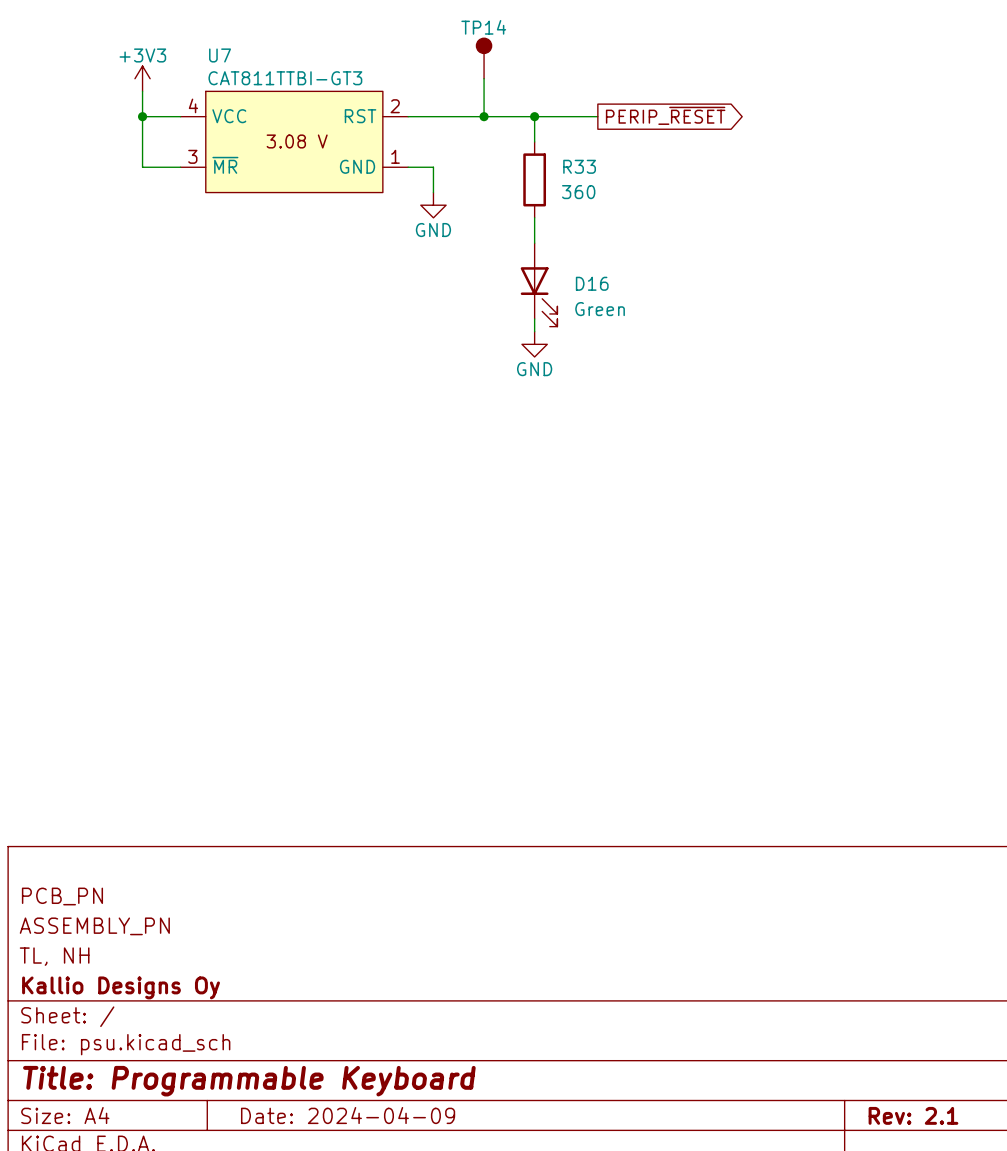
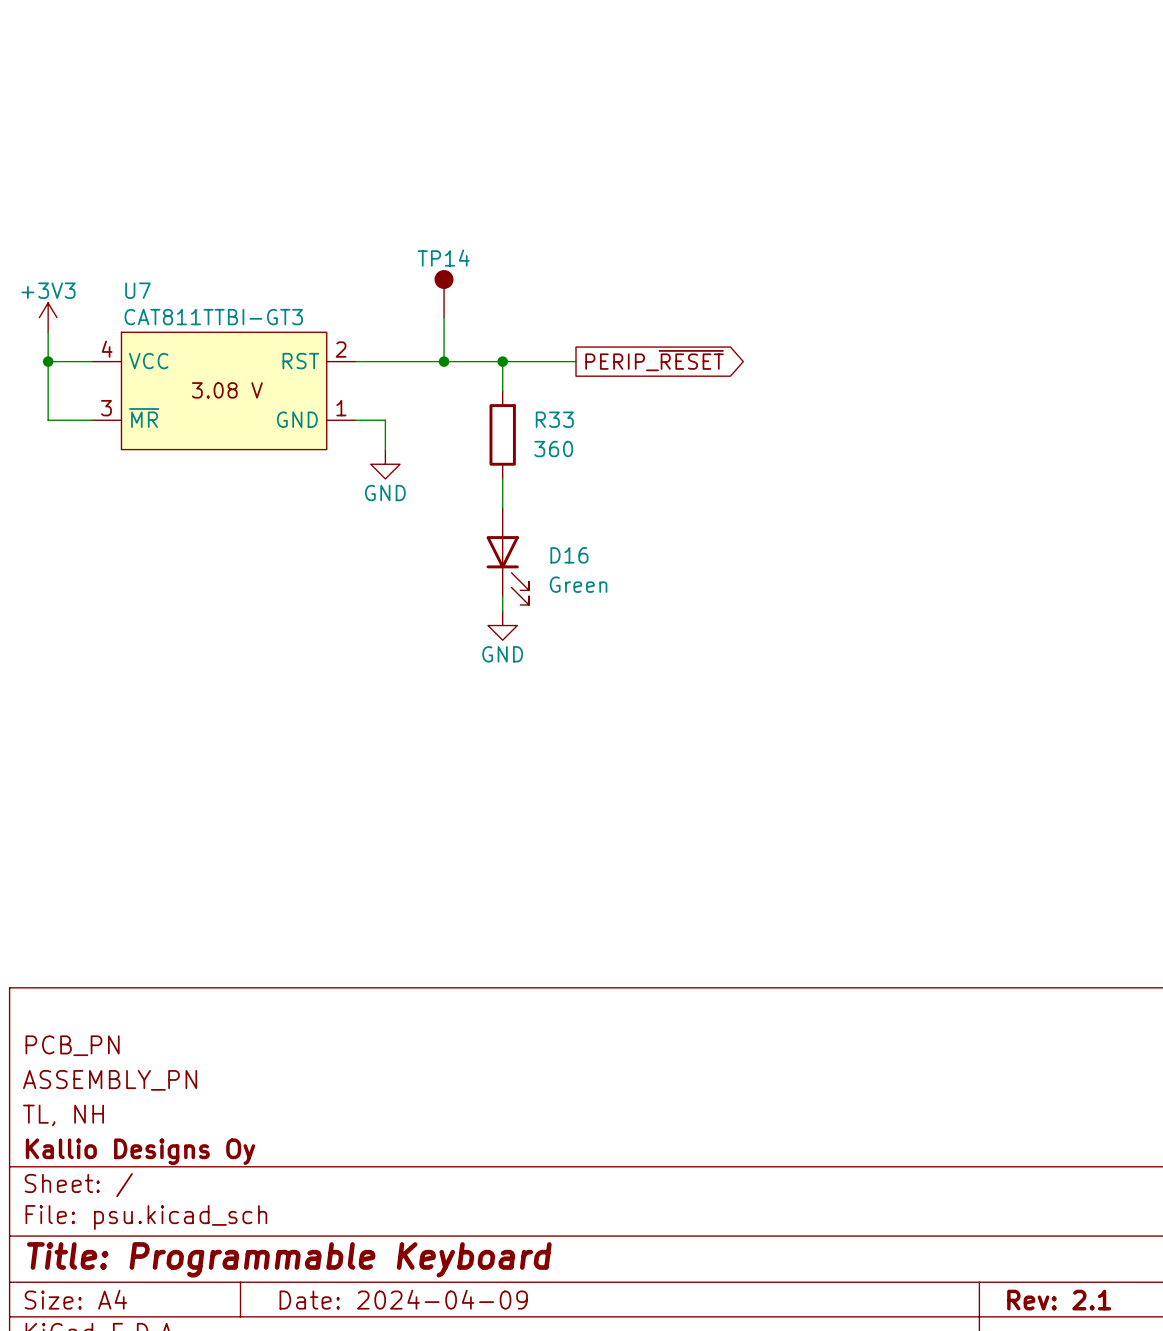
TP14 position: (484, 58) -> (444, 294)
power symbol position: +3V3 (142, 78) -> +3V3 (48, 317)
wire: (484, 78) (484, 116) -> (444, 317) (444, 361)
wire: (142, 91) (142, 167) (180, 167) -> (48, 332) (48, 420) (92, 420)
global label position: PERIP_~{RESET} (665, 115) -> PERIP_~{RESET} (654, 360)
wire: (142, 116) (180, 116) -> (48, 361) (92, 361)
junction: (142, 116) -> none
wire: (408, 116) (597, 116) -> (356, 361) (576, 361)
junction: (484, 116) -> none
wire: (534, 116) (534, 141) -> (502, 361) (502, 390)
junction: (534, 116) -> none
U7 position: (294, 141) -> (224, 390)
wire: (408, 167) (433, 167) (433, 192) -> (356, 420) (385, 420) (385, 449)
R33 position: (534, 179) -> (502, 434)
power symbol: GND (433, 205) -> none
wire: (534, 217) (534, 243) -> (502, 478) (502, 508)
D16 position: (539, 284) -> (507, 556)
junction: none -> (48, 361)
junction: none -> (444, 361)
junction: none -> (502, 361)
wire: (534, 319) (534, 331) -> (502, 596) (502, 610)
power symbol: GND (534, 344) -> none
power symbol: none -> GND (385, 464)
power symbol: none -> GND (502, 625)

